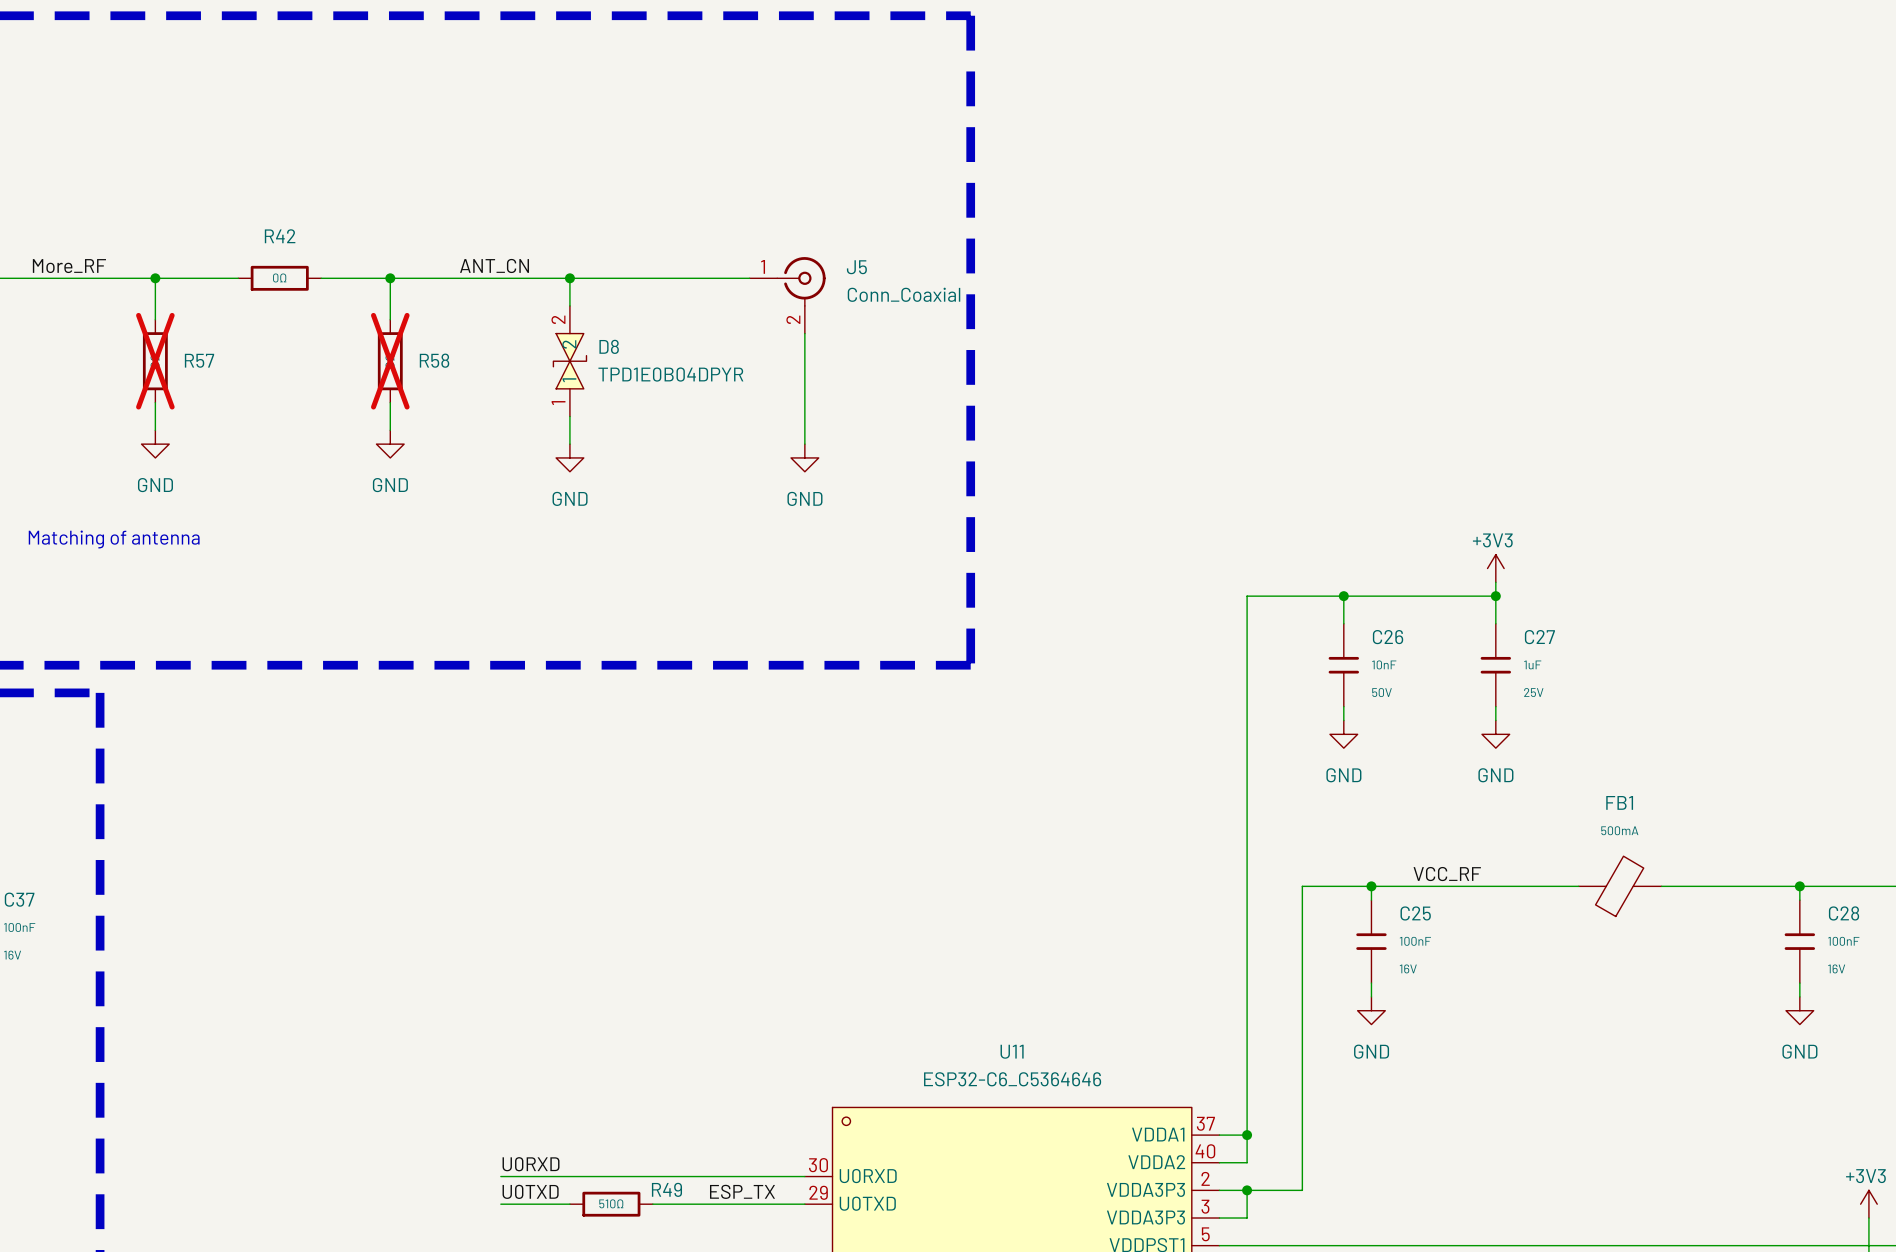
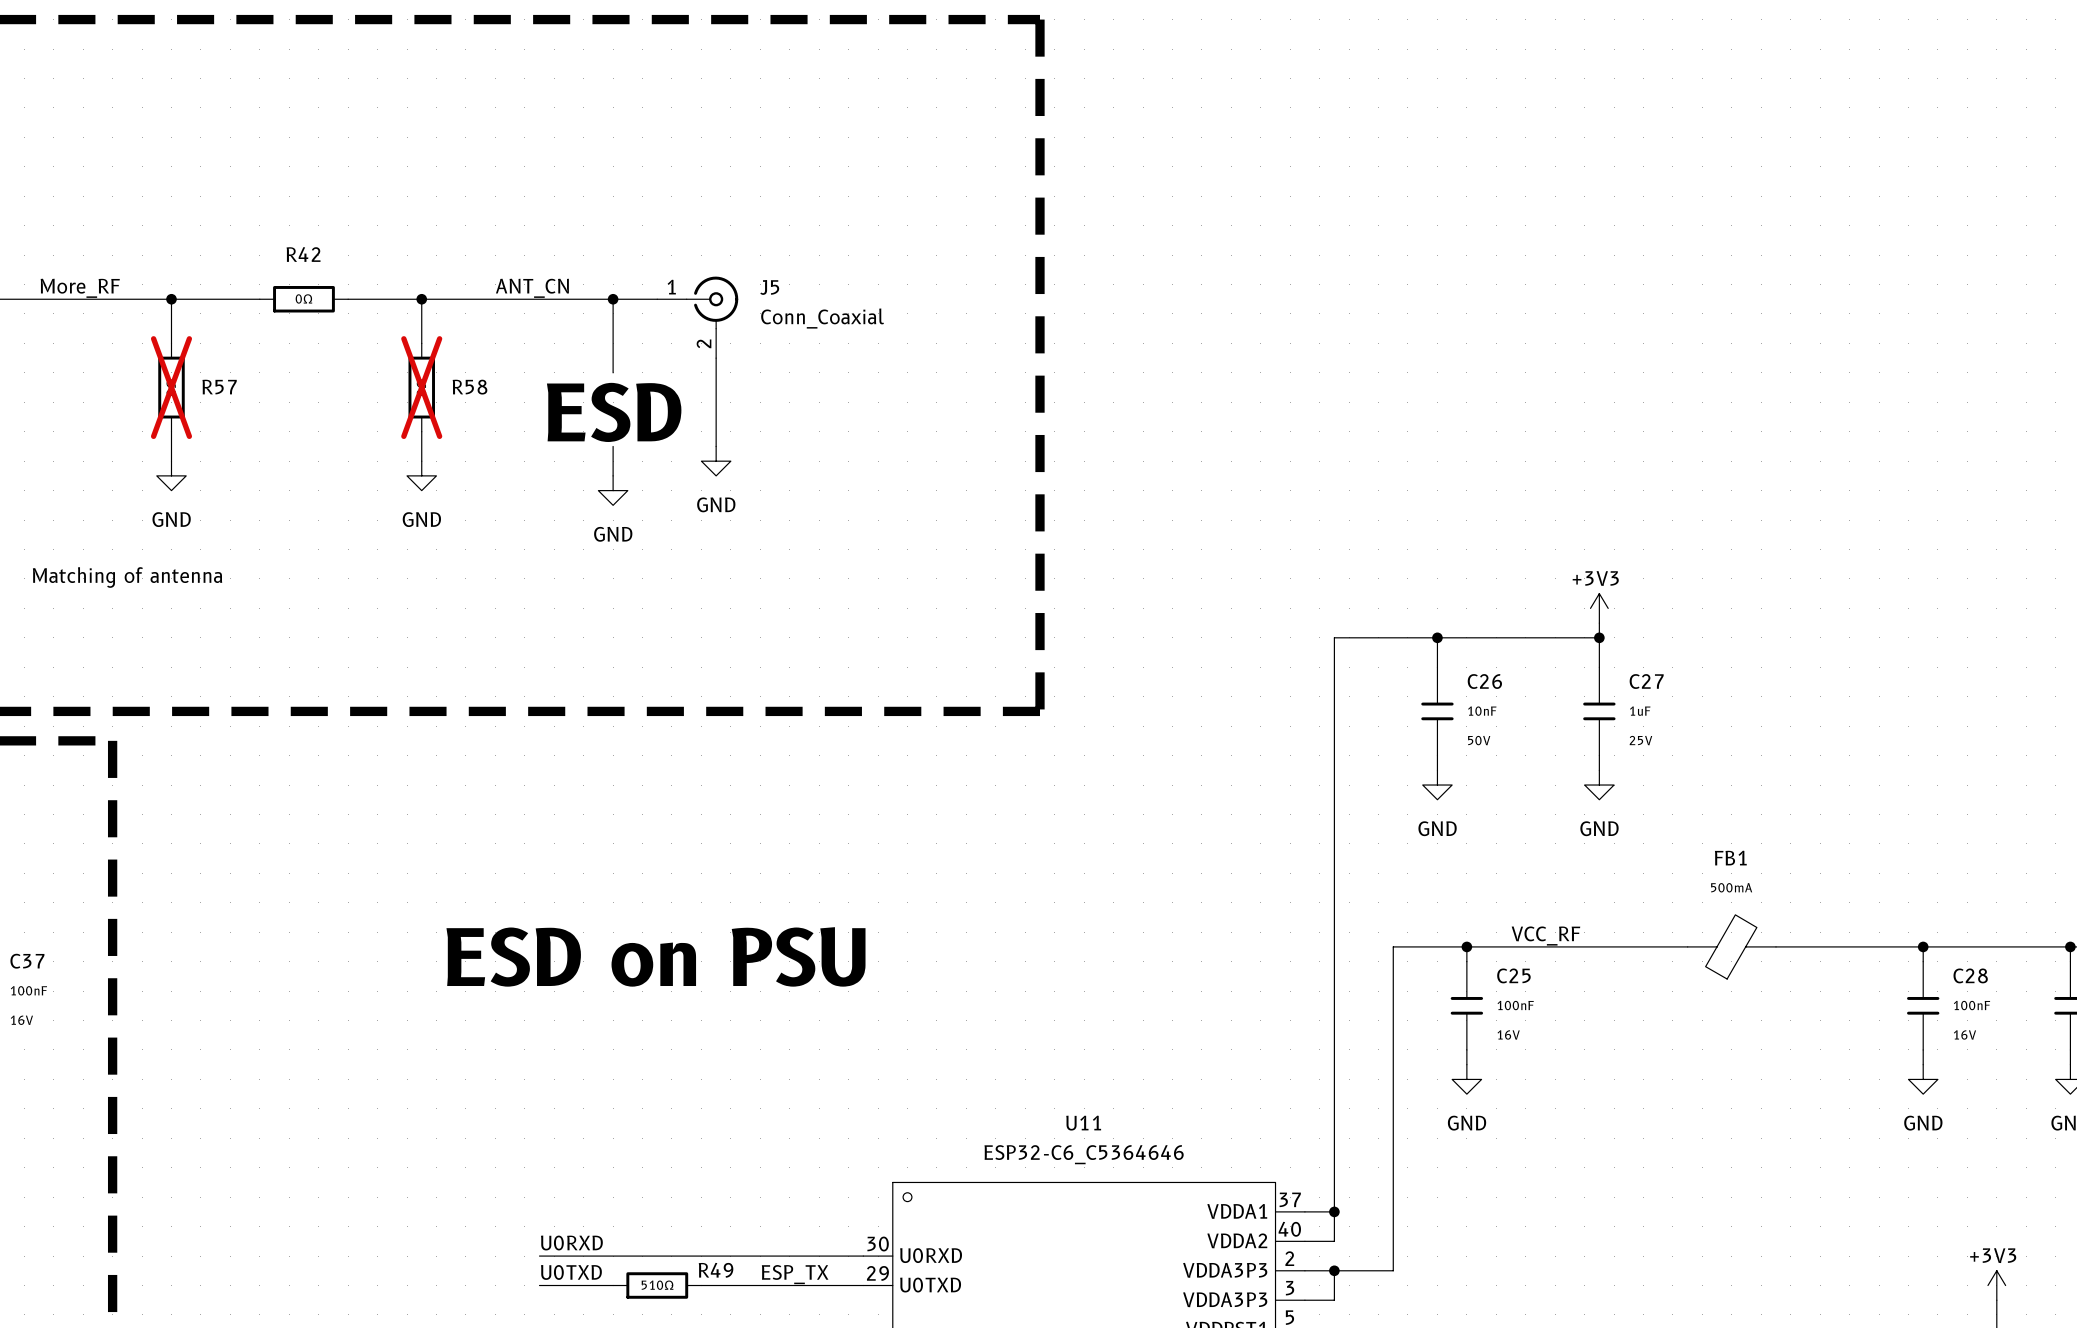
wire: (611, 278) (749, 278) -> none
J5 position: (787, 295) -> (697, 317)
wire: none -> (716, 358) (716, 446)
wire: (804, 333) (804, 444) -> none
D8: TPD1E0B04DPYR (569, 361) -> none
text: none -> ESD (614, 412)
power symbol position: GND (804, 457) -> GND (716, 461)
text: none -> ESD on PSU (655, 956)

